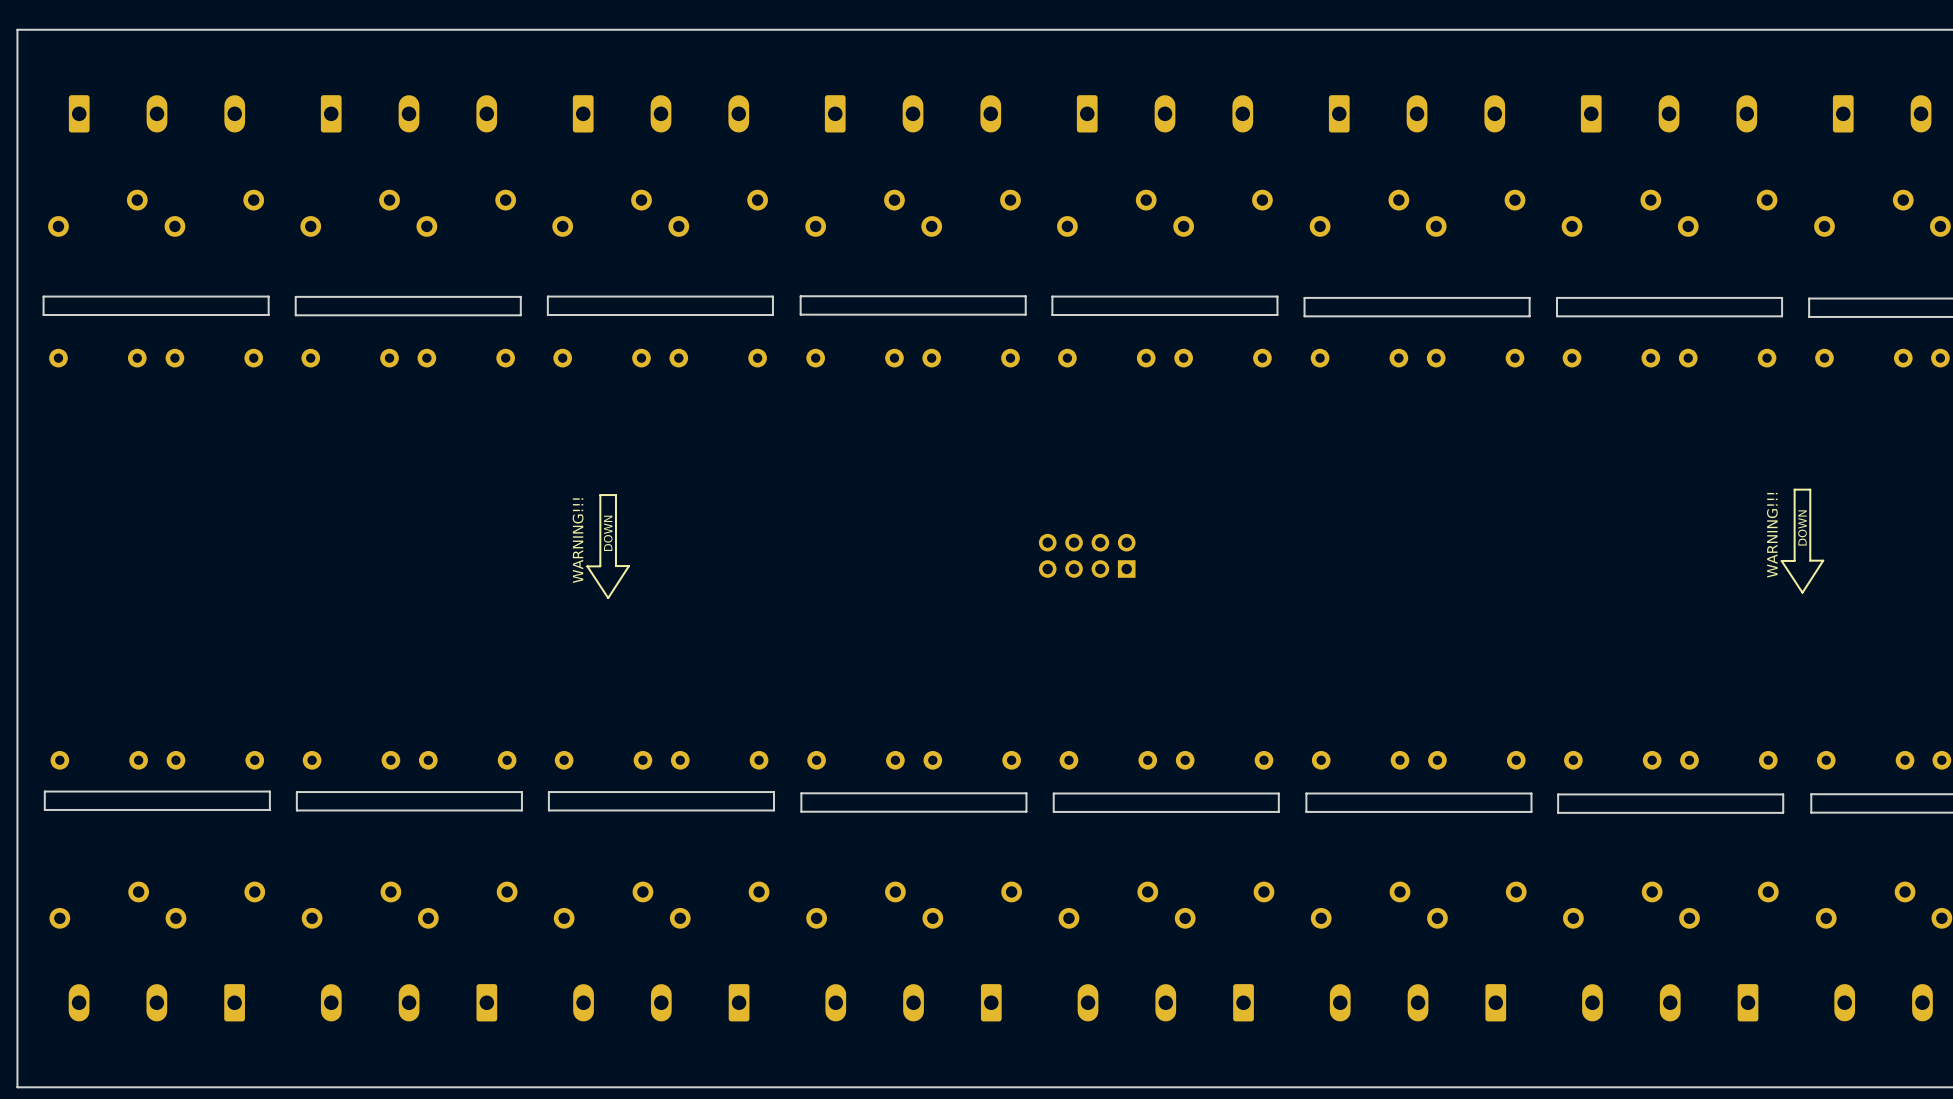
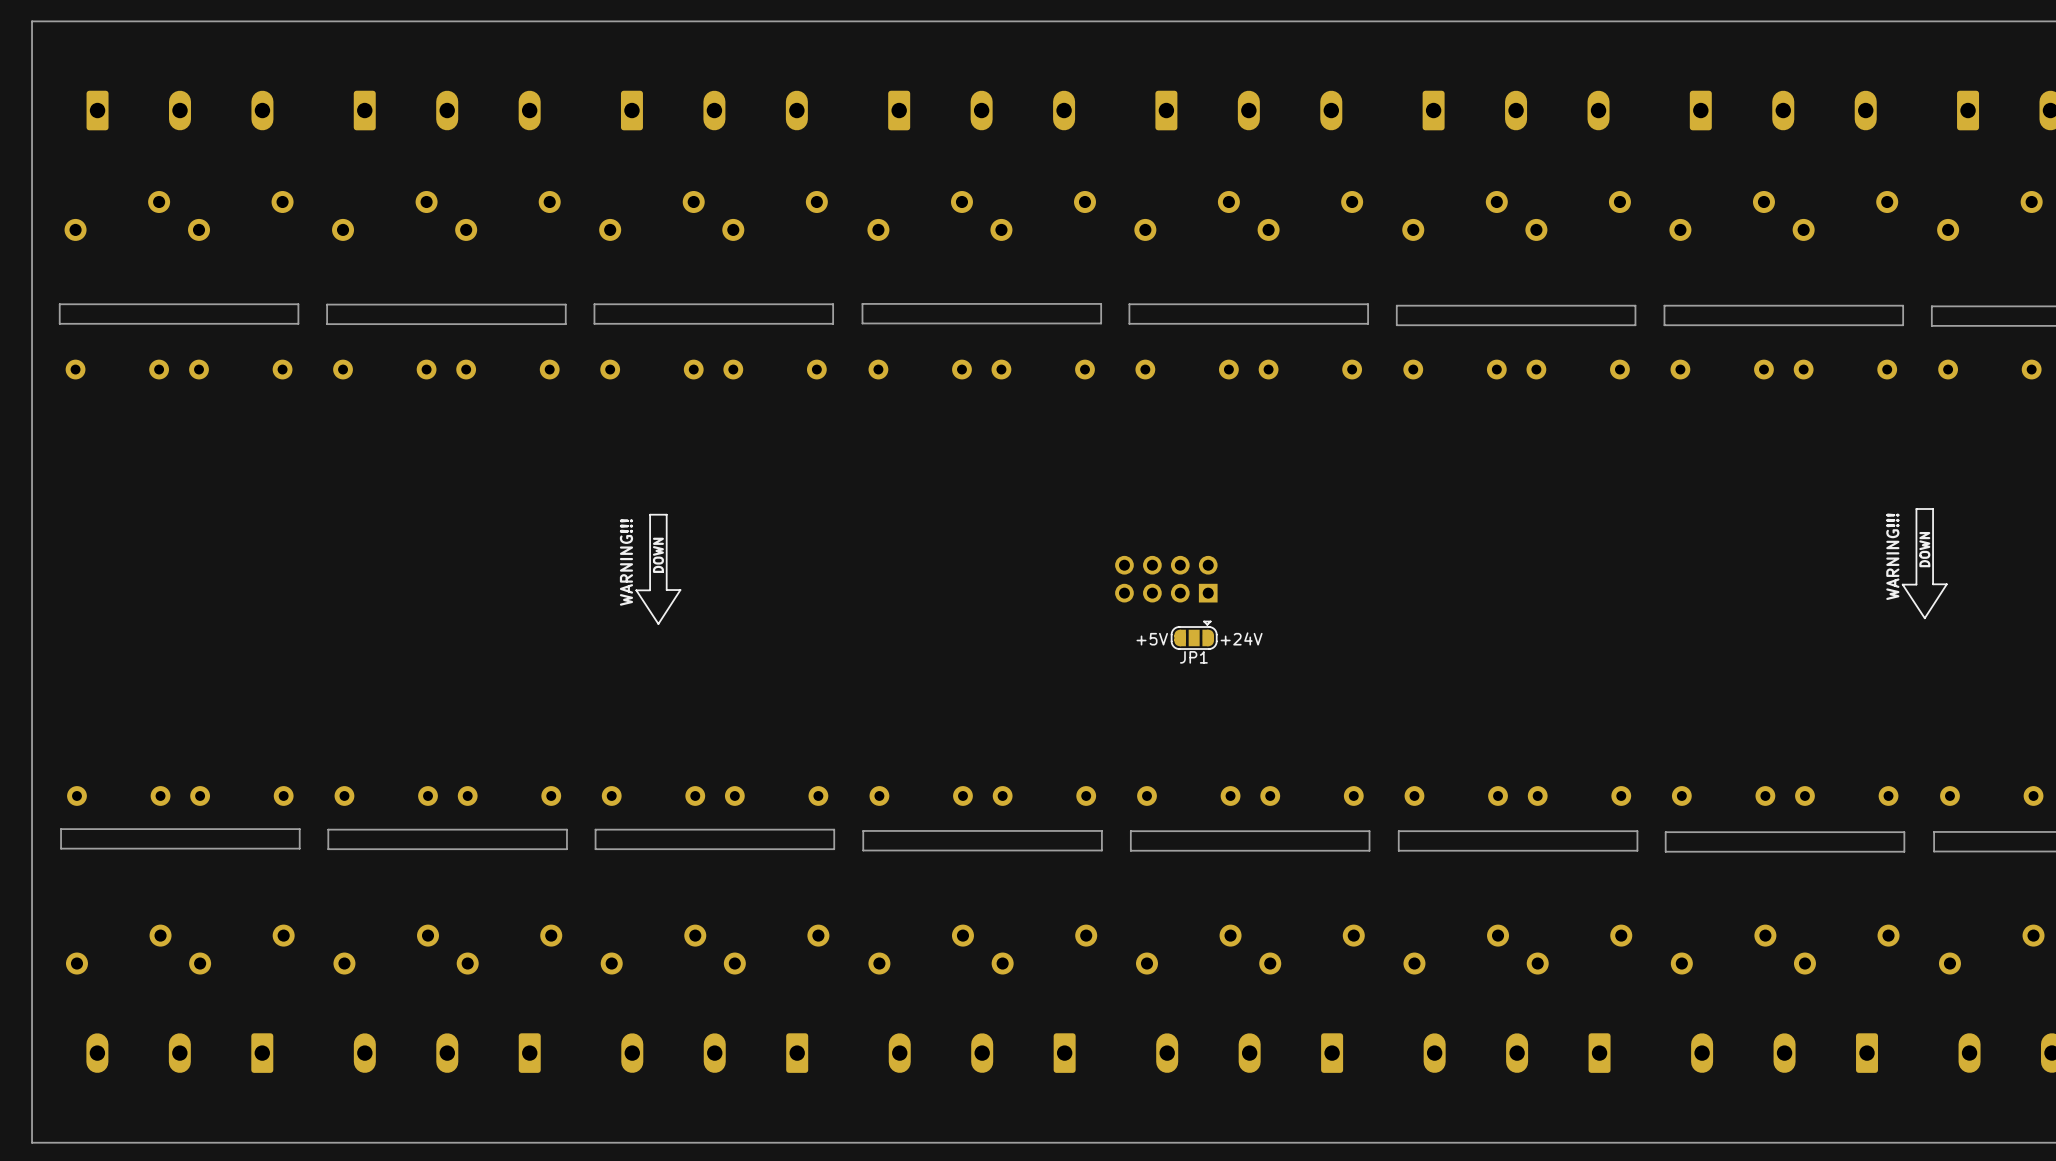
JP1: none -> (1194, 635)
text: none -> +5V (1152, 639)
text: none -> +24V (1241, 638)

